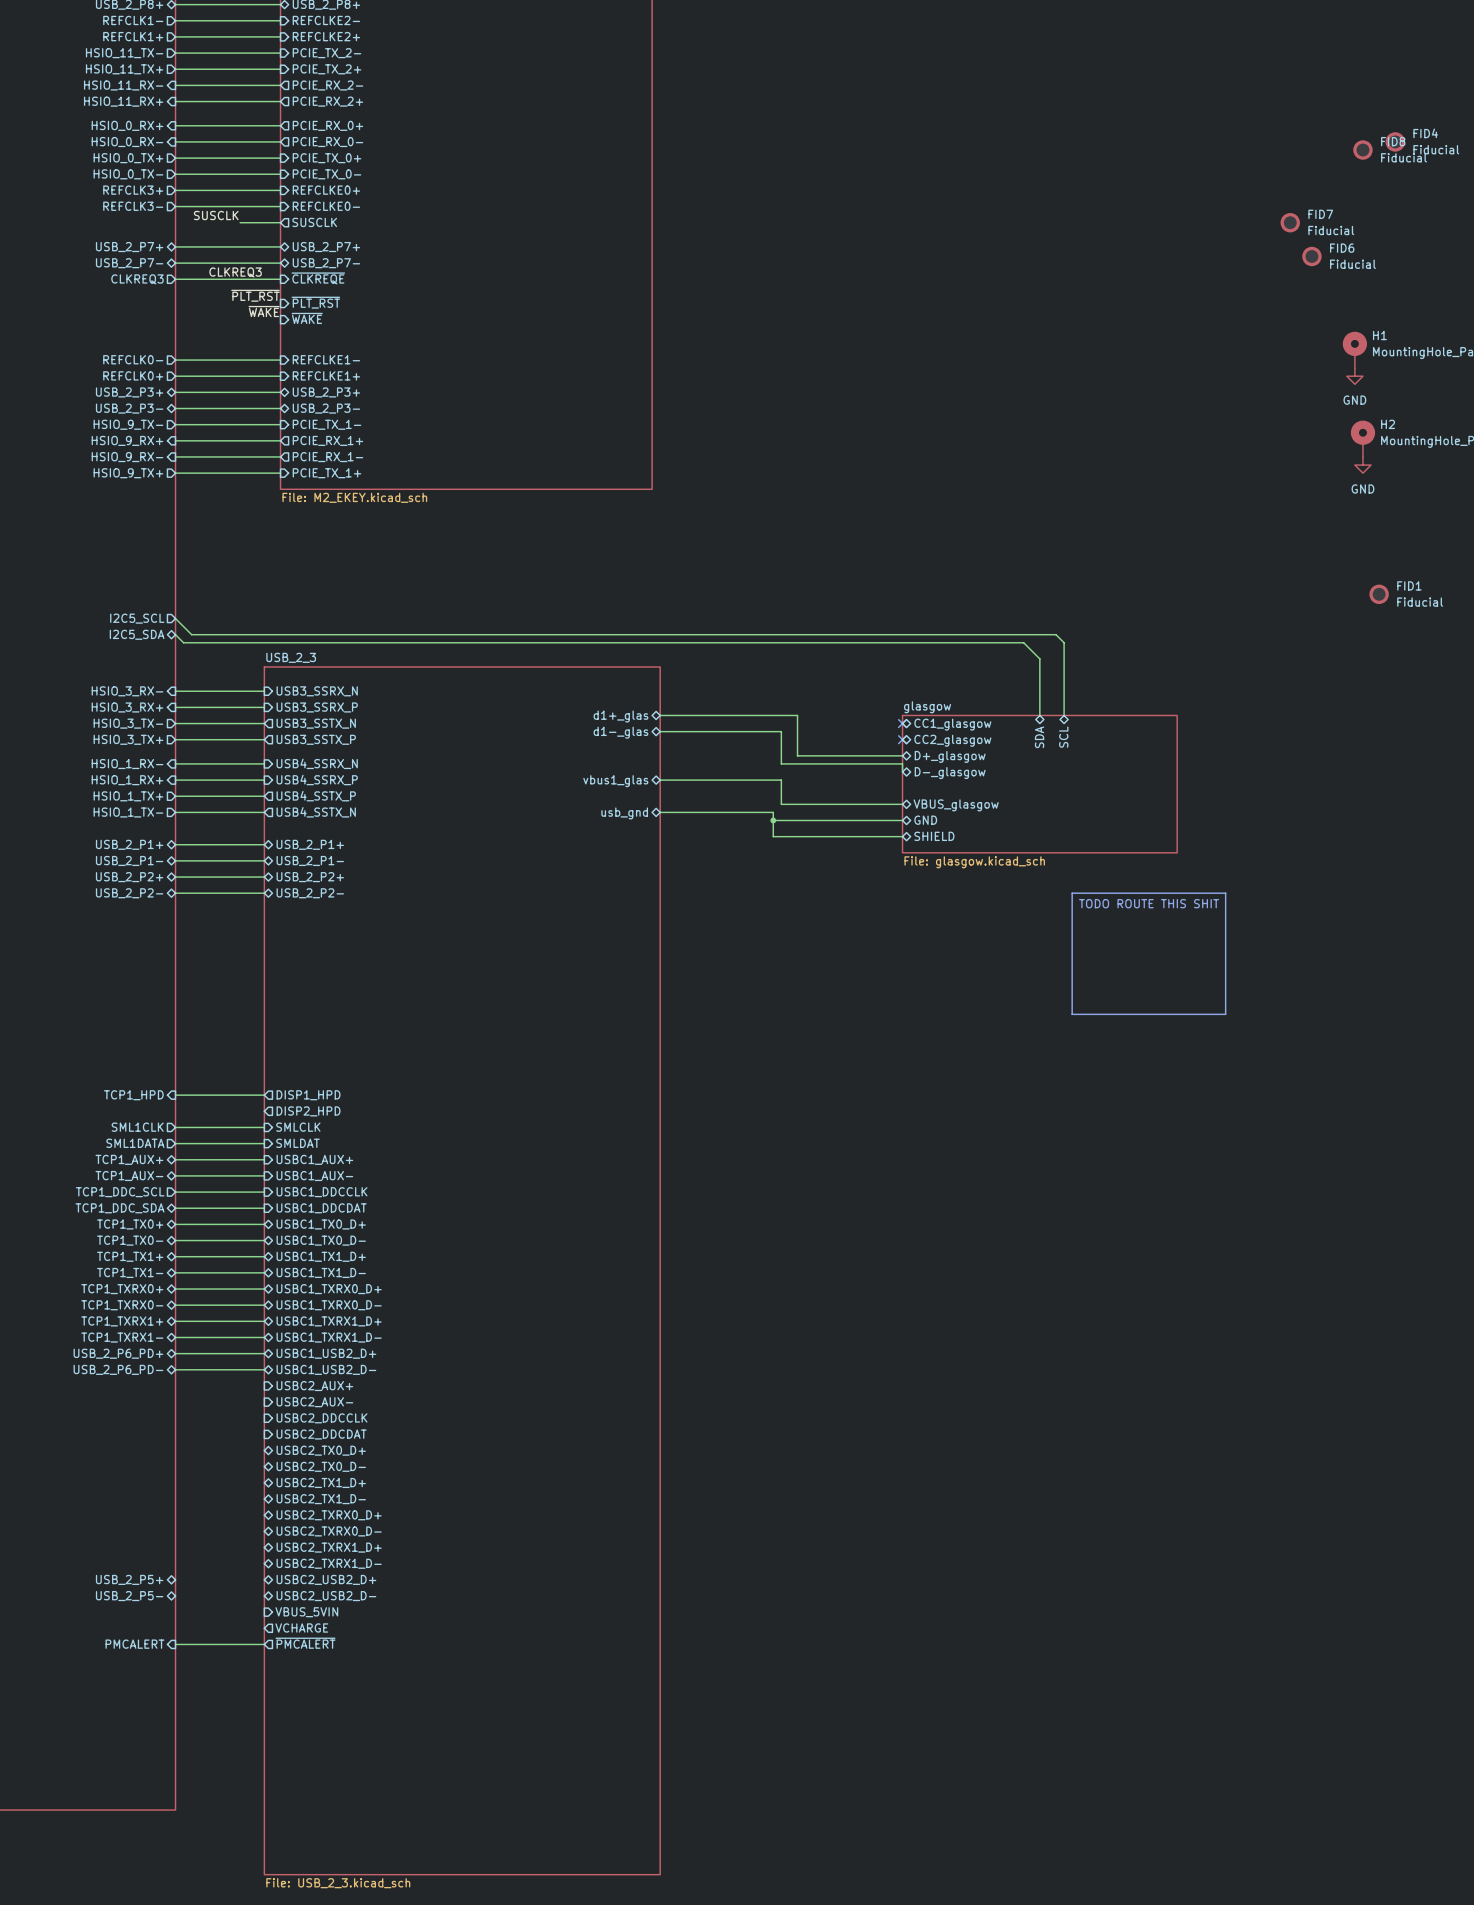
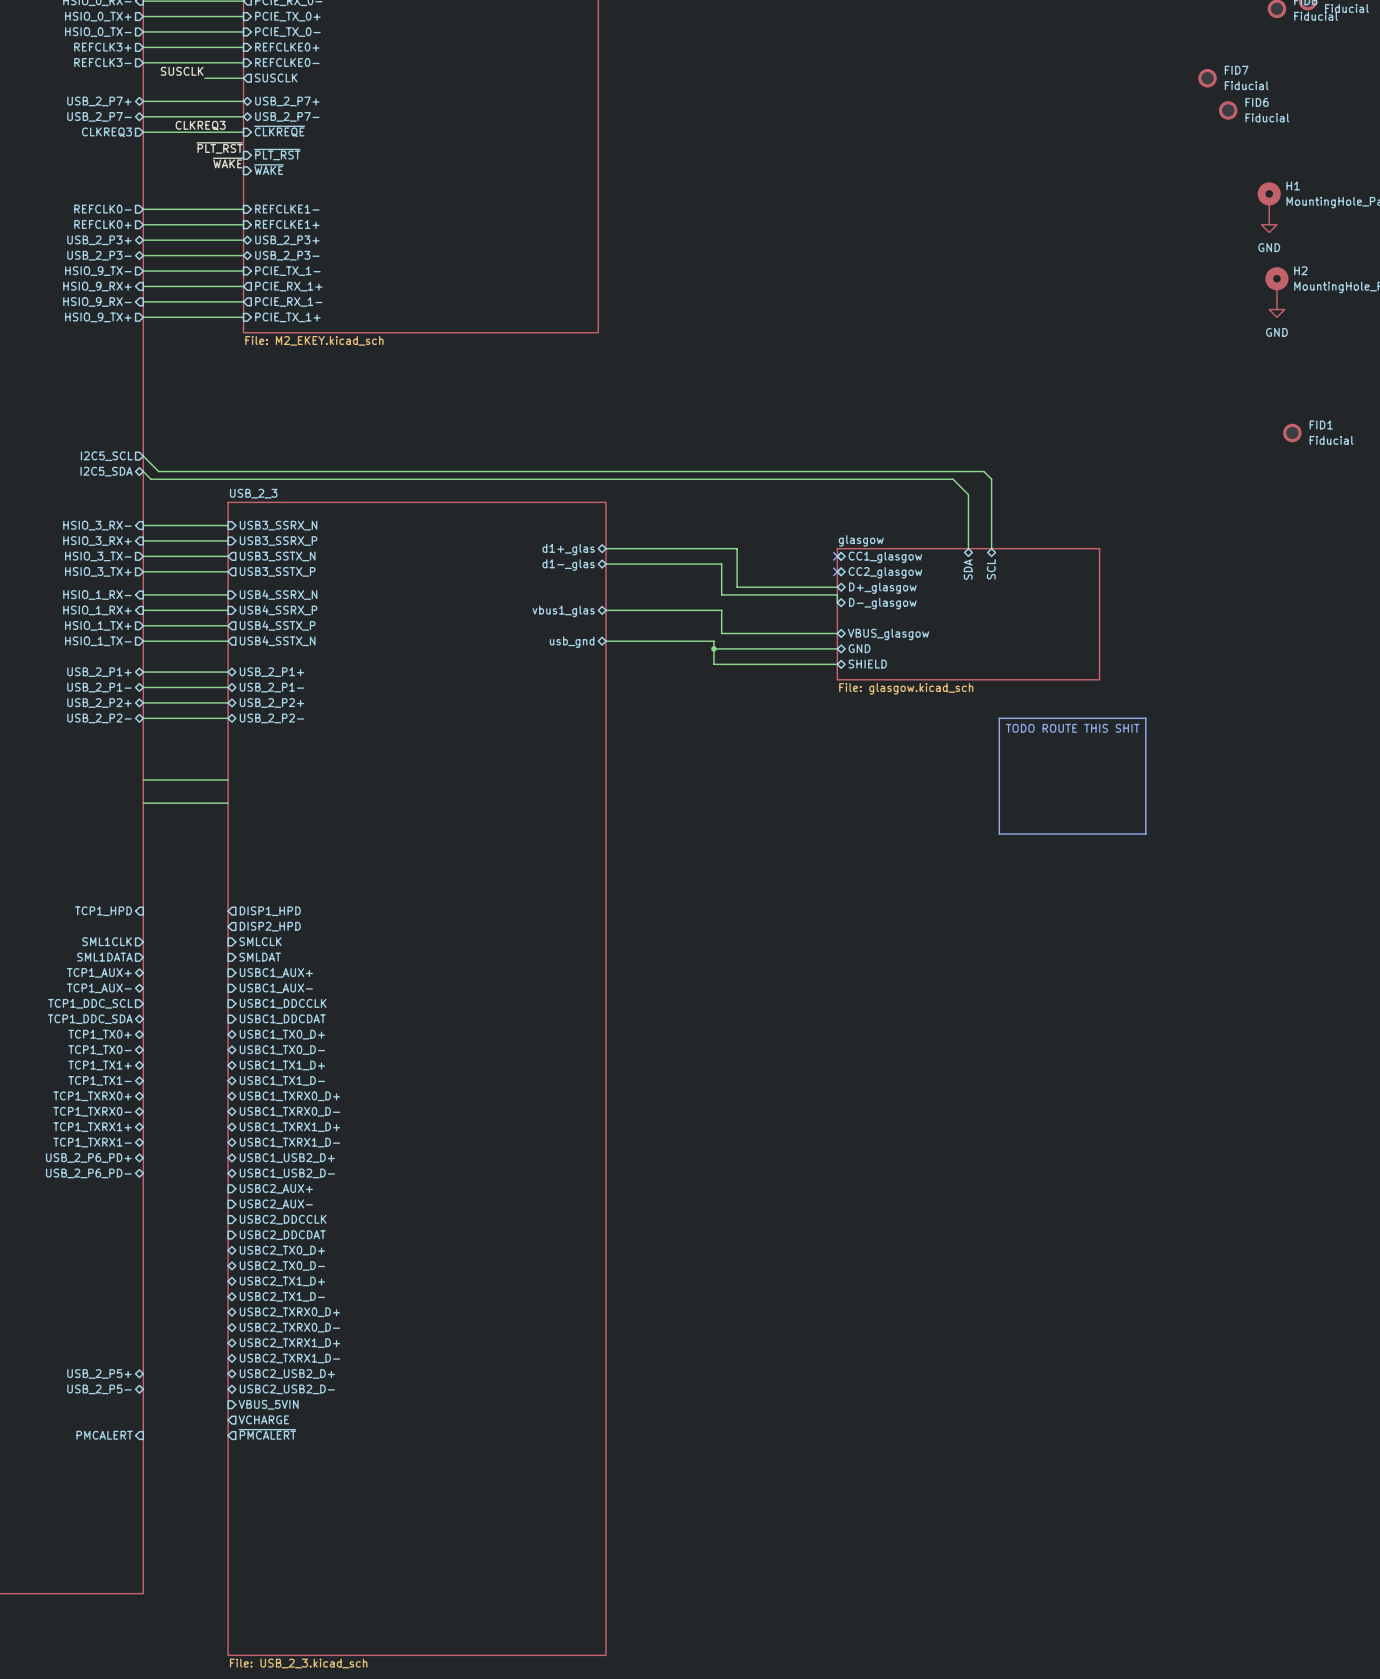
wire: none -> (143, 780) (228, 780)
wire: (175, 1095) (264, 1095) -> (143, 803) (228, 803)
wire: (175, 1127) (264, 1127) -> none
wire: (175, 1143) (264, 1143) -> none
wire: (175, 1159) (264, 1159) -> none
wire: (175, 1175) (264, 1175) -> none
wire: (175, 1192) (264, 1192) -> none
wire: (175, 1208) (264, 1208) -> none
wire: (175, 1224) (264, 1224) -> none
wire: (175, 1240) (264, 1240) -> none
wire: (175, 1256) (264, 1256) -> none
wire: (175, 1272) (264, 1272) -> none
wire: (175, 1289) (264, 1289) -> none
wire: (175, 1305) (264, 1305) -> none
wire: (175, 1321) (264, 1321) -> none
wire: (175, 1337) (264, 1337) -> none
wire: (175, 1353) (264, 1353) -> none
wire: (175, 1369) (264, 1369) -> none
wire: (175, 1644) (264, 1644) -> none

